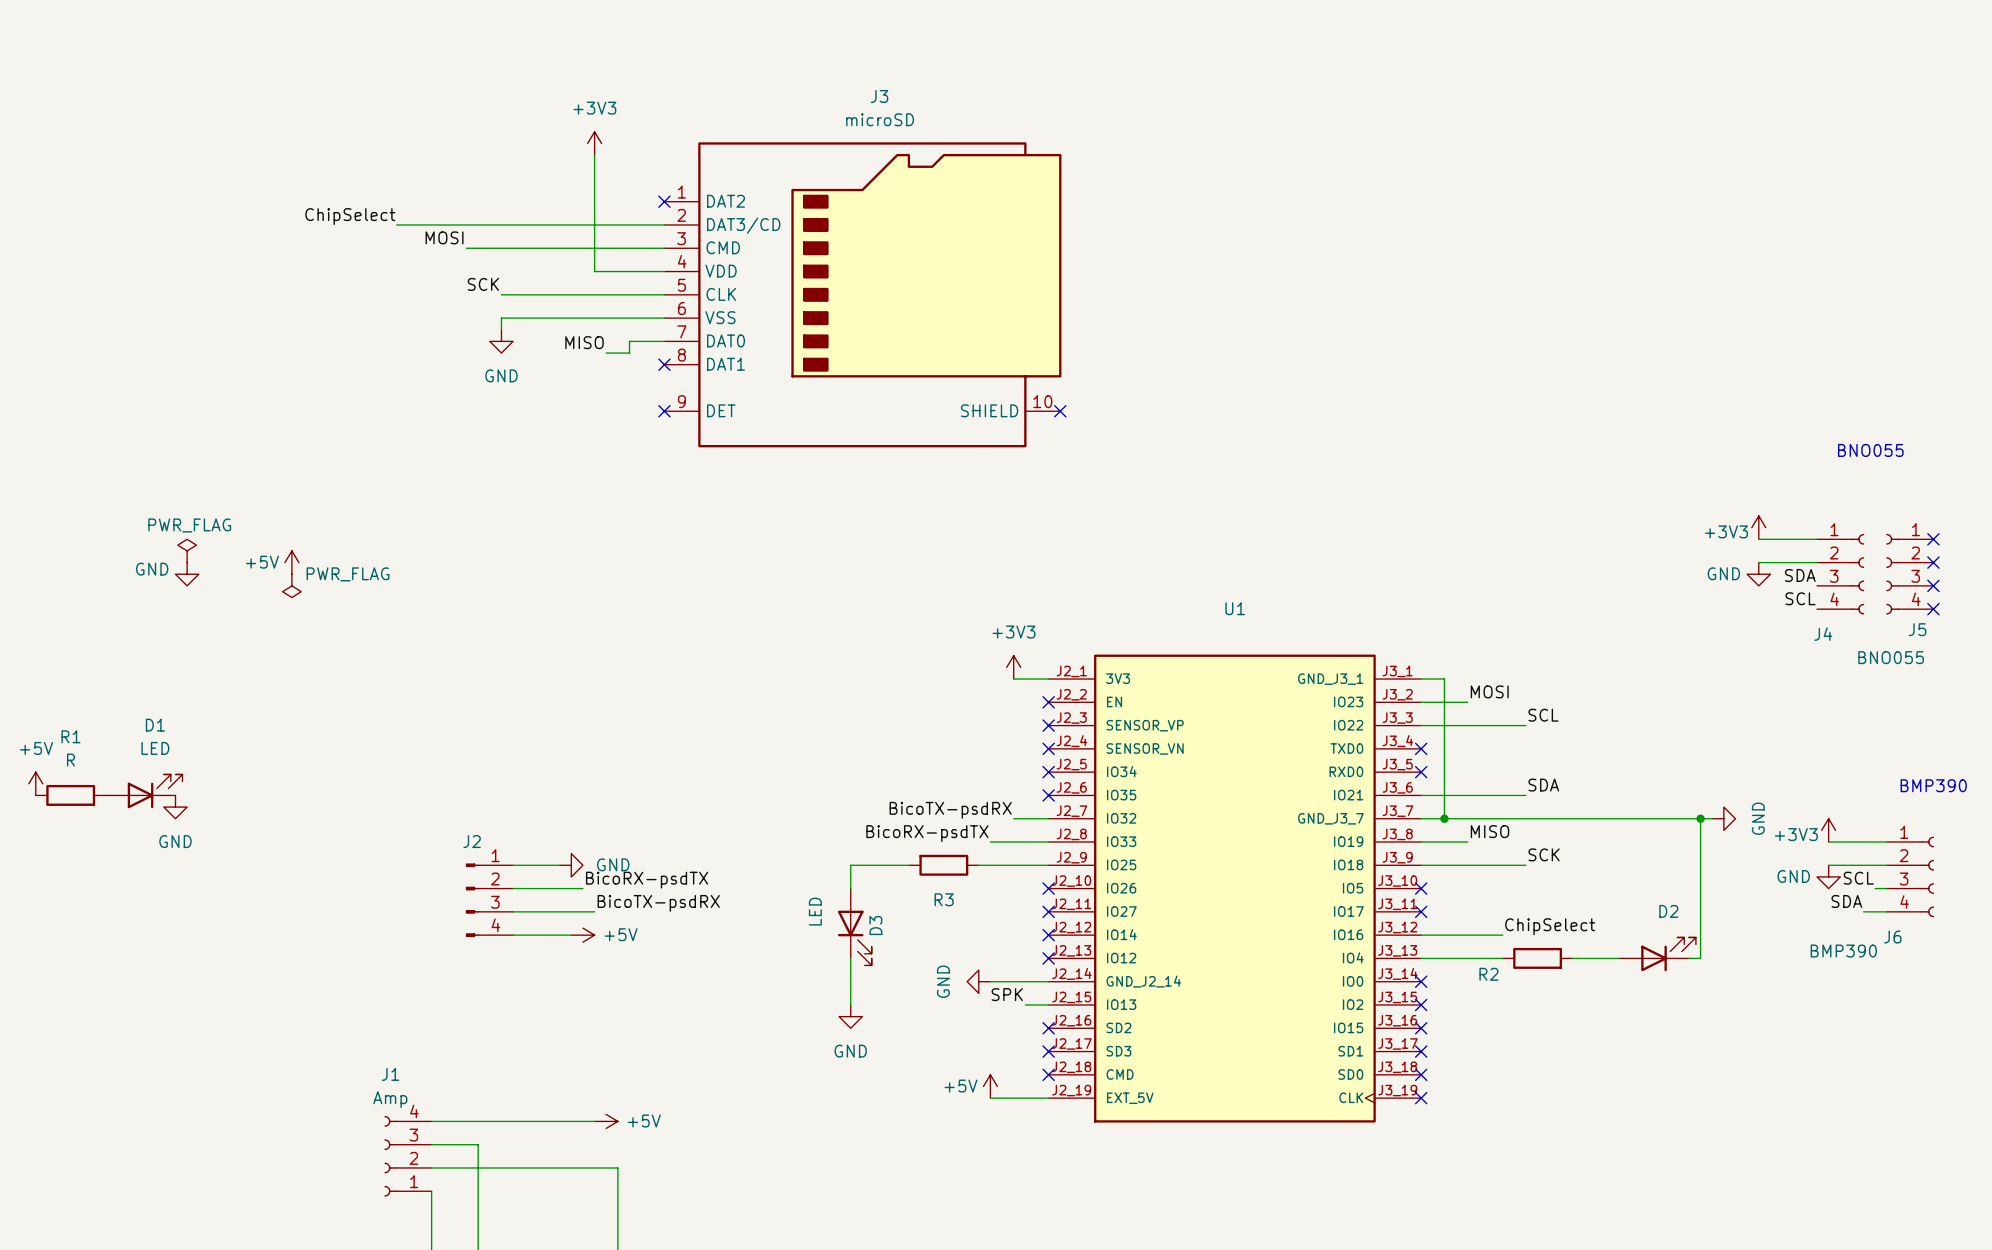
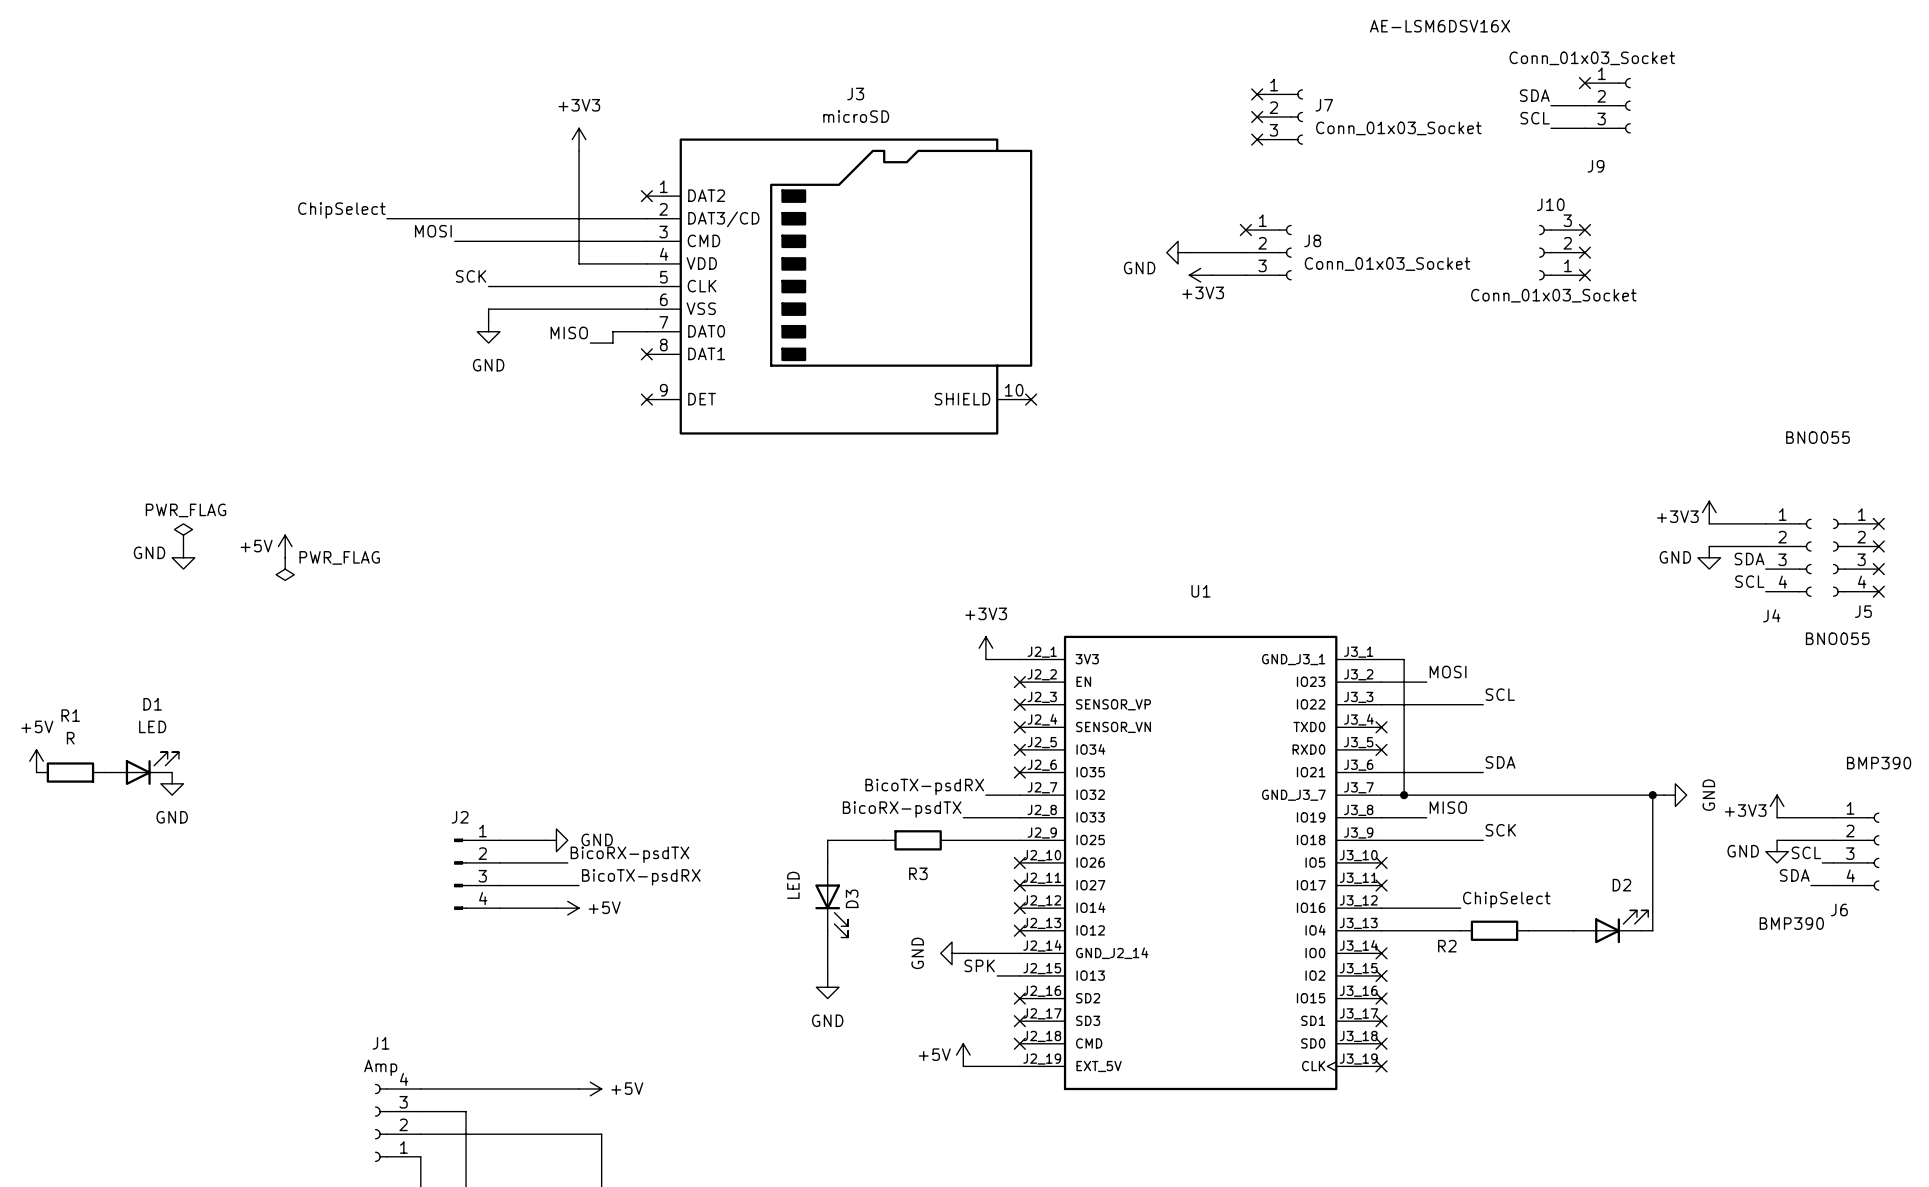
text: none -> AE-LSM6DSV16X (1440, 26)
no-connect mark: none -> (1584, 83)
no-connect mark: none -> (1257, 94)
label: none -> SDA (1534, 95)
wire: none -> (1551, 105) (1584, 105)
J9: none -> Conn_01x03_Socket (1607, 105)
no-connect mark: none -> (1257, 117)
J7: none -> Conn_01x03_Socket (1280, 117)
label: none -> SCL (1535, 118)
wire: none -> (1551, 128) (1584, 128)
no-connect mark: none -> (1257, 139)
no-connect mark: none -> (1245, 230)
no-connect mark: none -> (1584, 230)
power symbol: none -> GND (1178, 252)
wire: none -> (1189, 252) (1245, 252)
J8: none -> Conn_01x03_Socket (1268, 252)
J10: none -> Conn_01x03_Socket (1562, 252)
no-connect mark: none -> (1584, 252)
power symbol: none -> +3V3 (1200, 275)
wire: none -> (1211, 275) (1245, 275)
no-connect mark: none -> (1584, 275)

